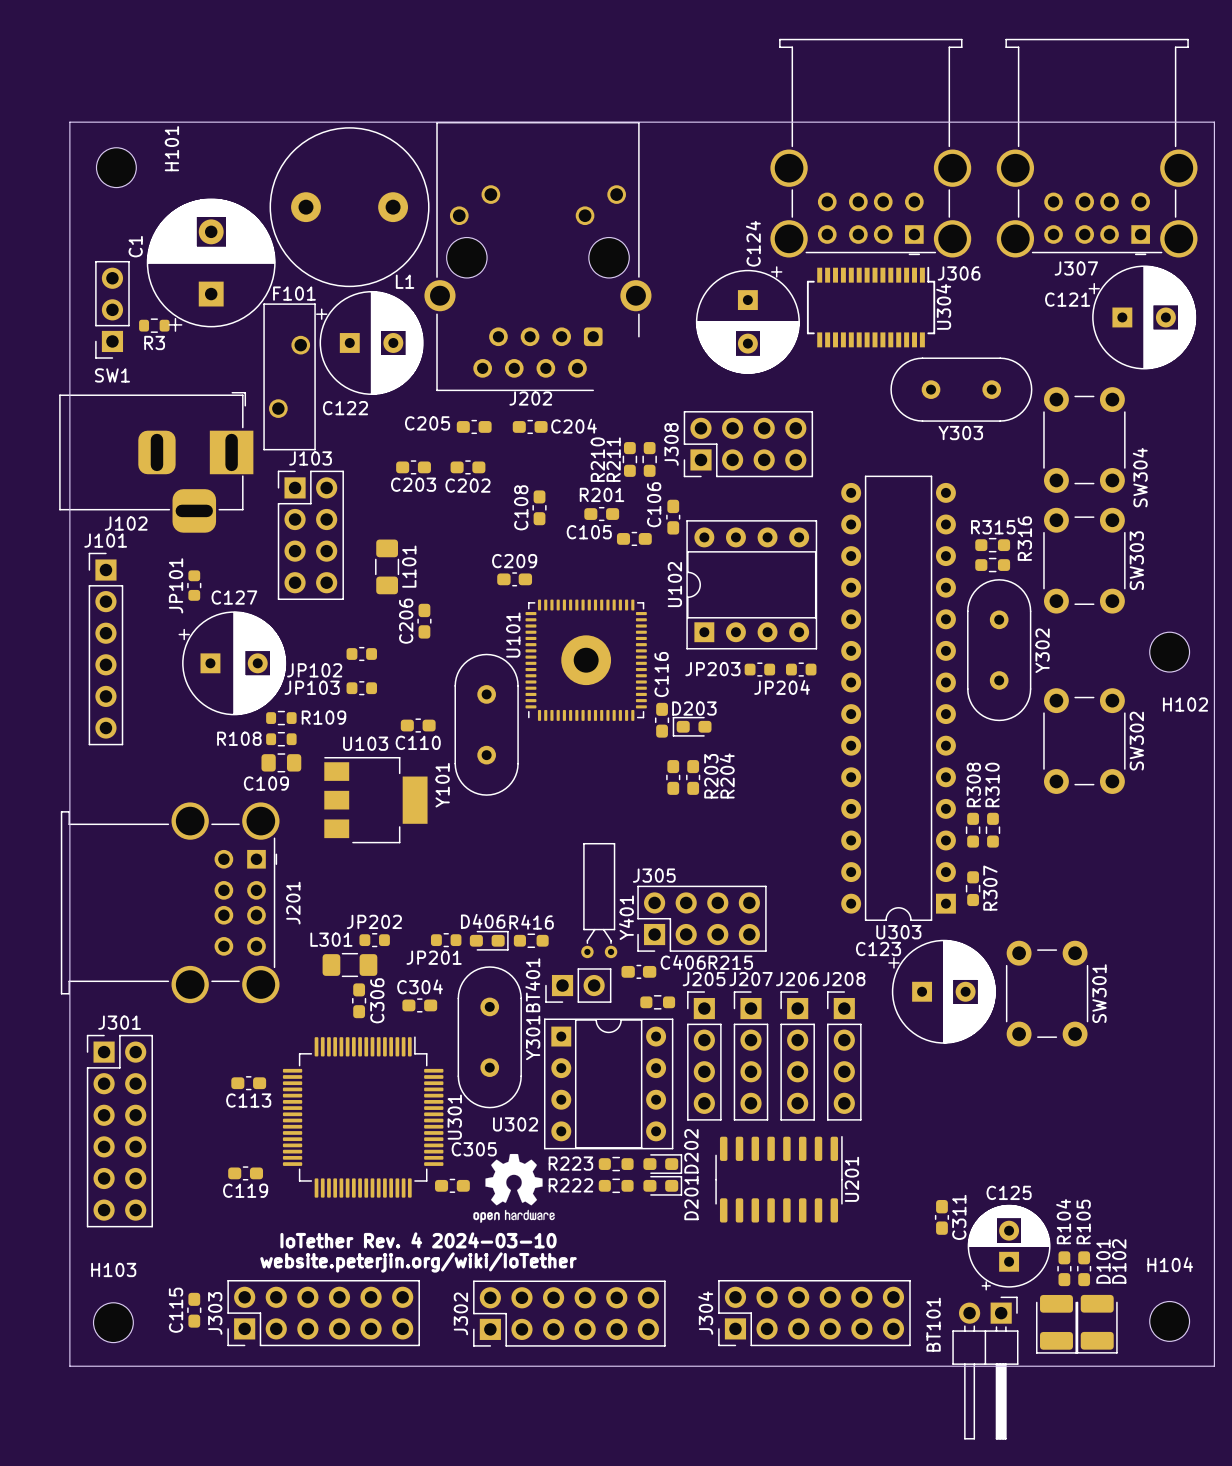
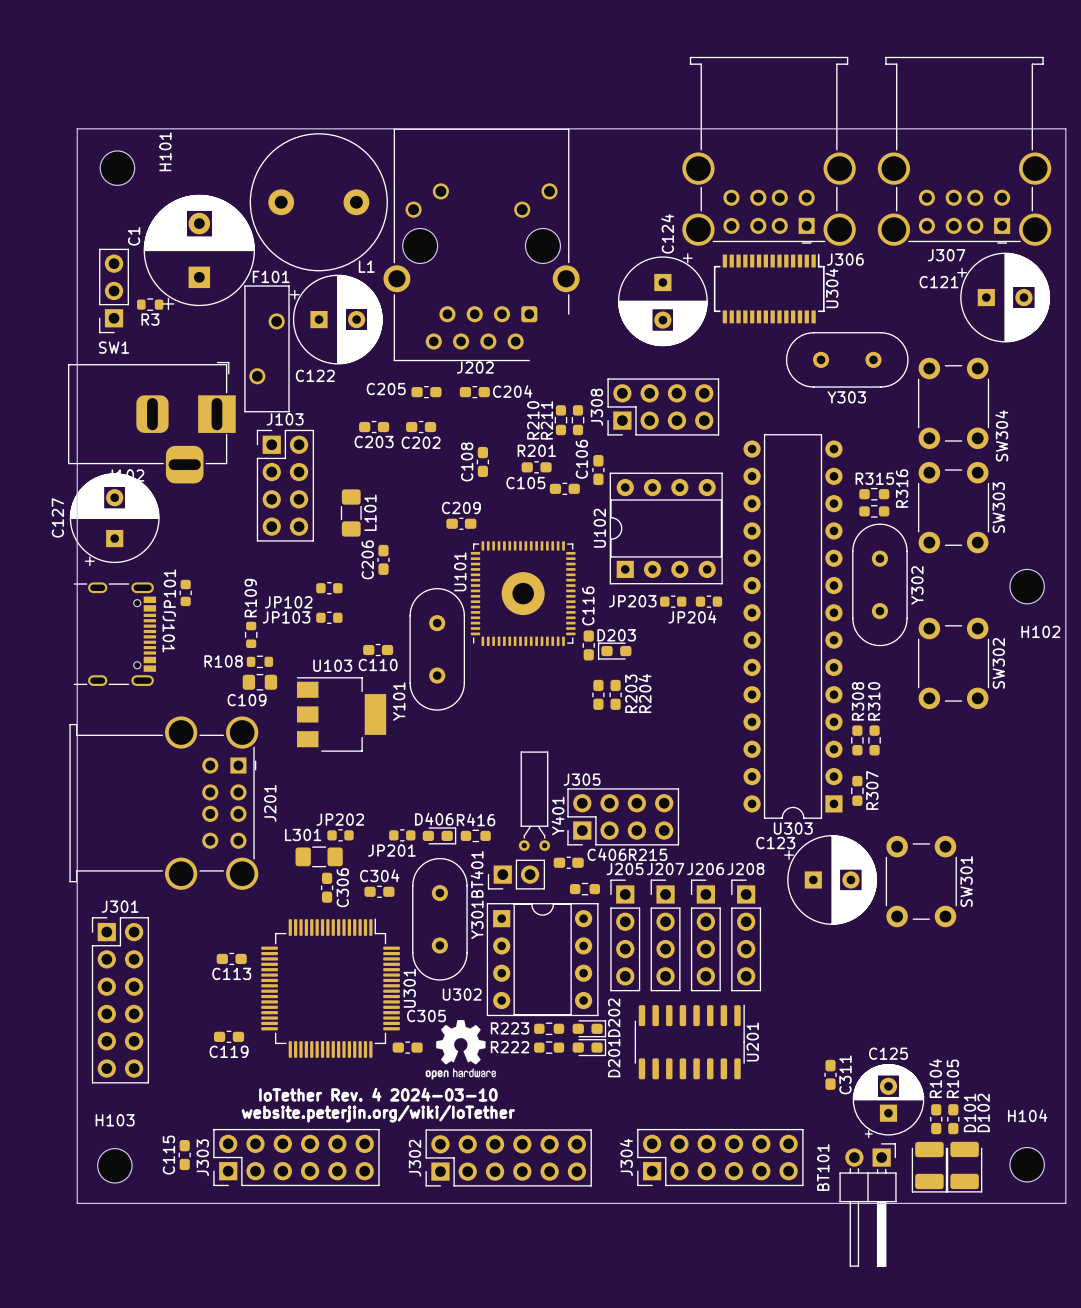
J101 name position: J101 (105, 540) -> J101 (168, 633)
J101 footprint: [88, 552, 124, 746] -> [73, 582, 157, 686]
JP101 position: (194, 585) -> (185, 592)
C127 rotation: 0° (232, 663) -> 90° counterclockwise (114, 519)
C127 position: (232, 663) -> (114, 519)
R109 name position: R109 (323, 717) -> R109 (250, 598)
R109 rotation: 0° (281, 718) -> 90° clockwise (251, 634)

